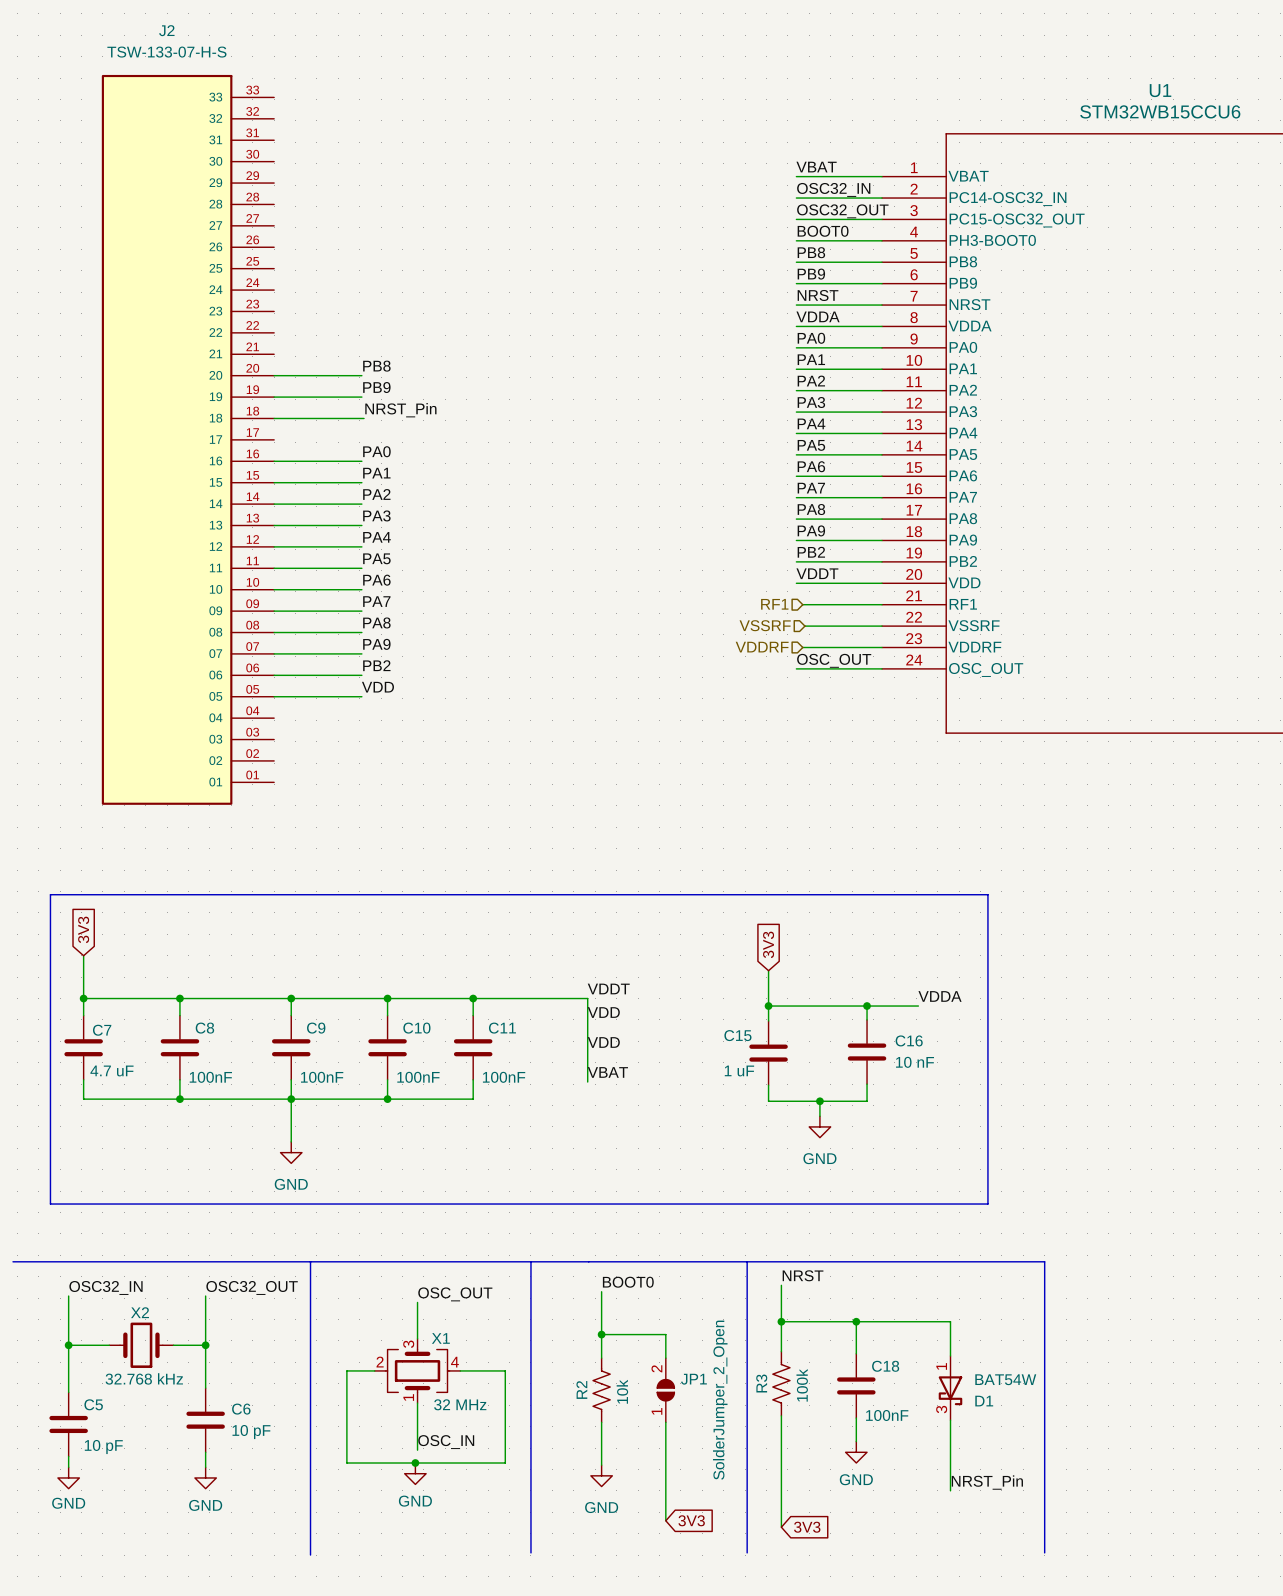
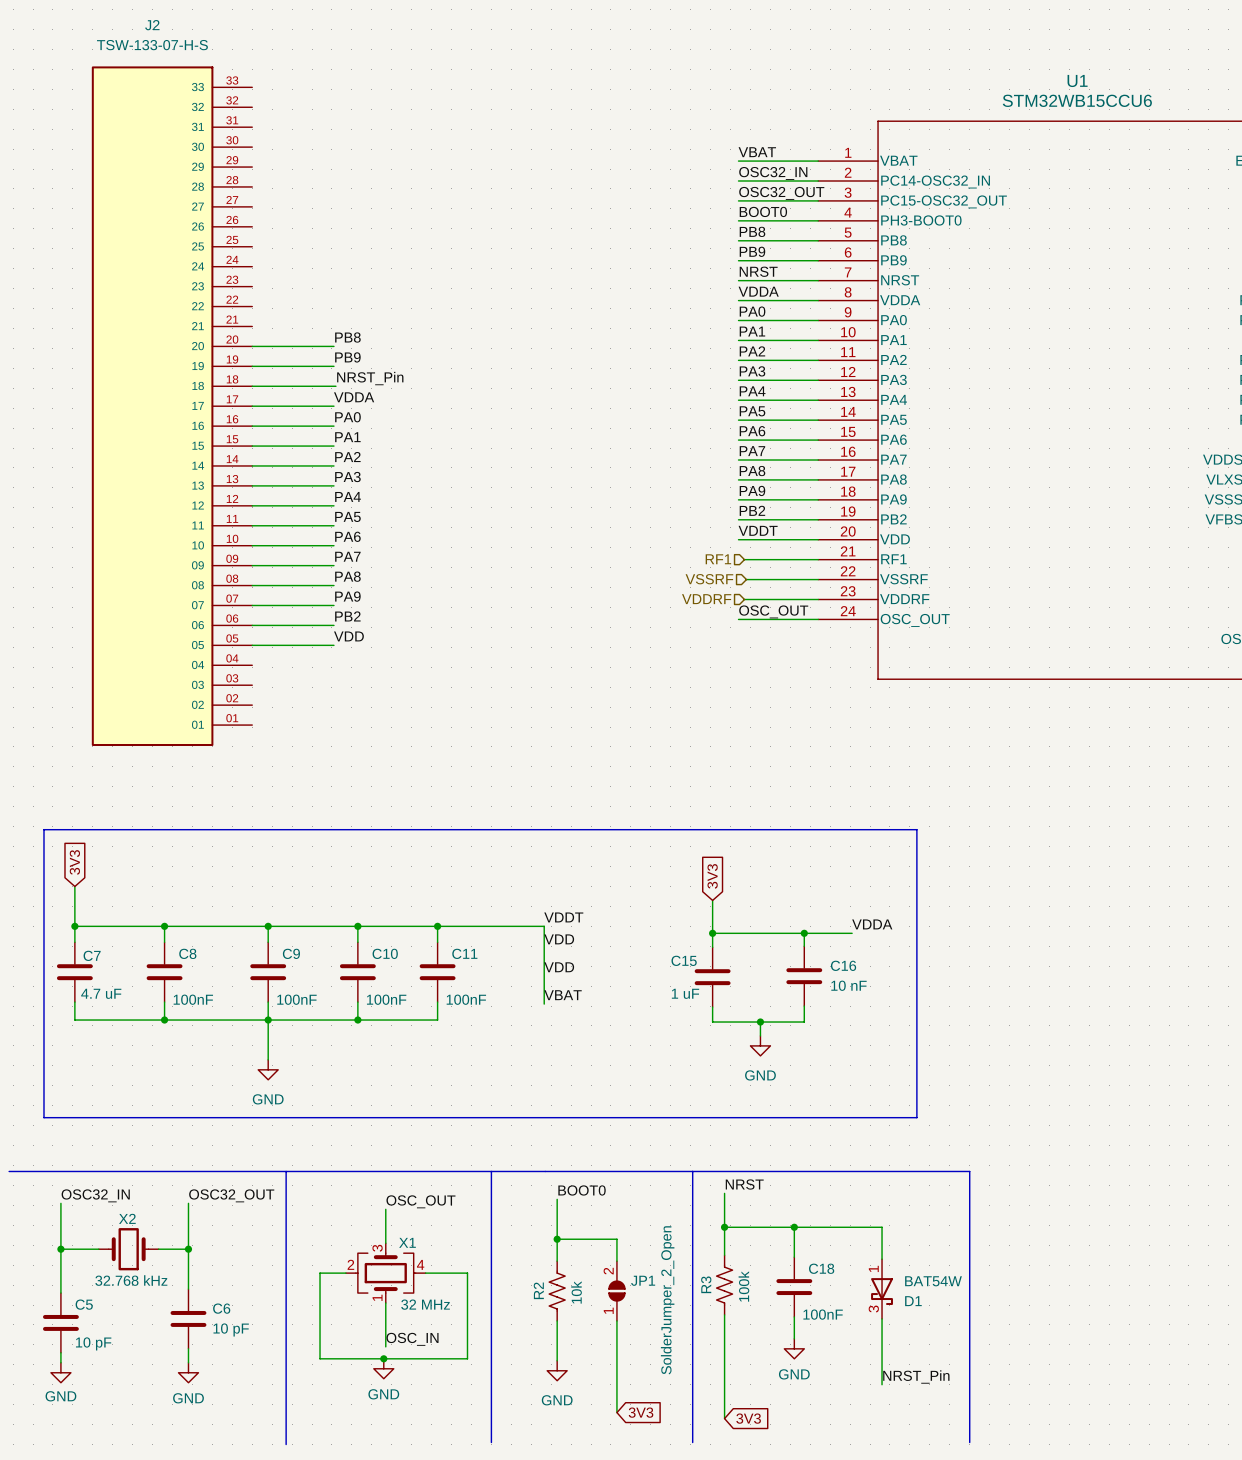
label: none -> VDDA (354, 397)
wire: none -> (252, 406) (333, 406)

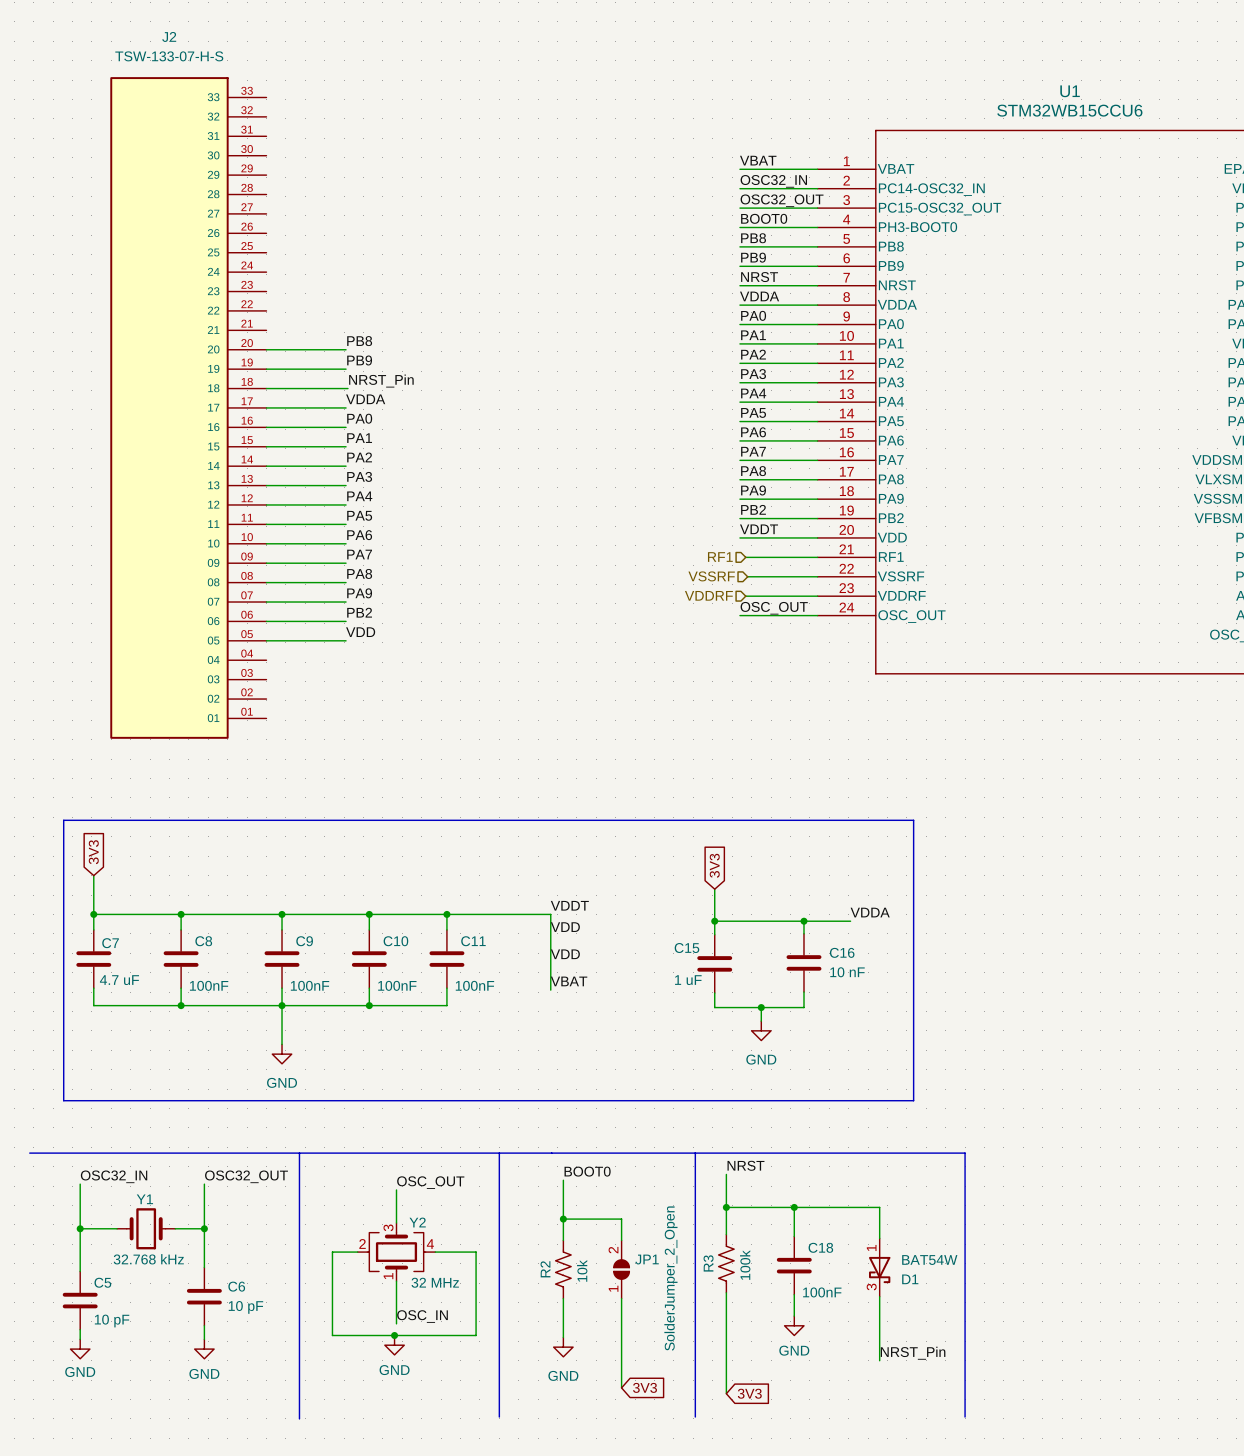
X2 name: X2 (127, 1218) -> Y1 (144, 1199)
X1 name: X1 (407, 1242) -> Y2 (417, 1222)

